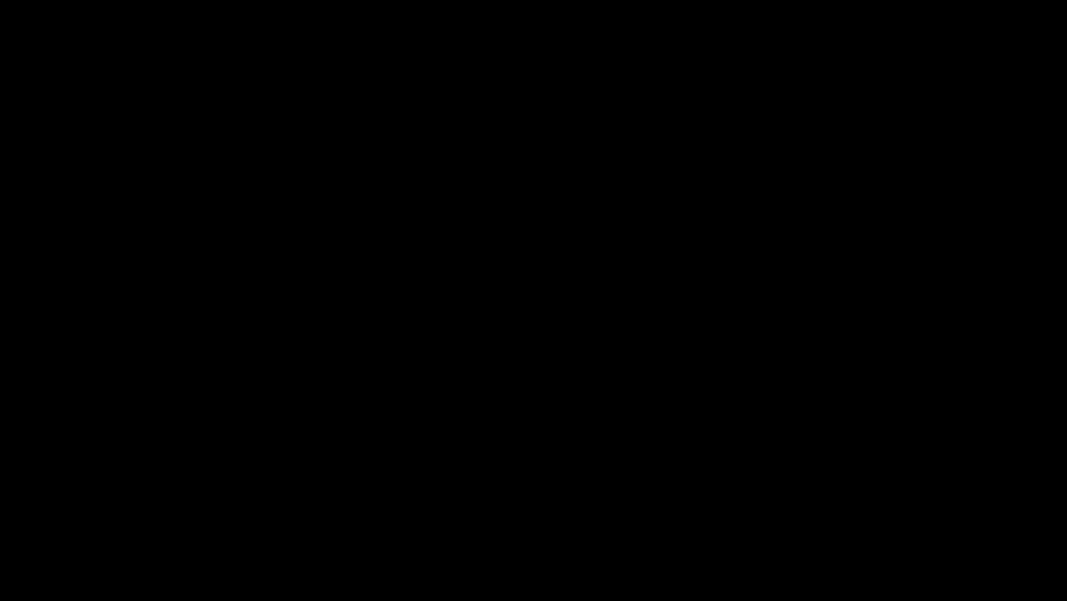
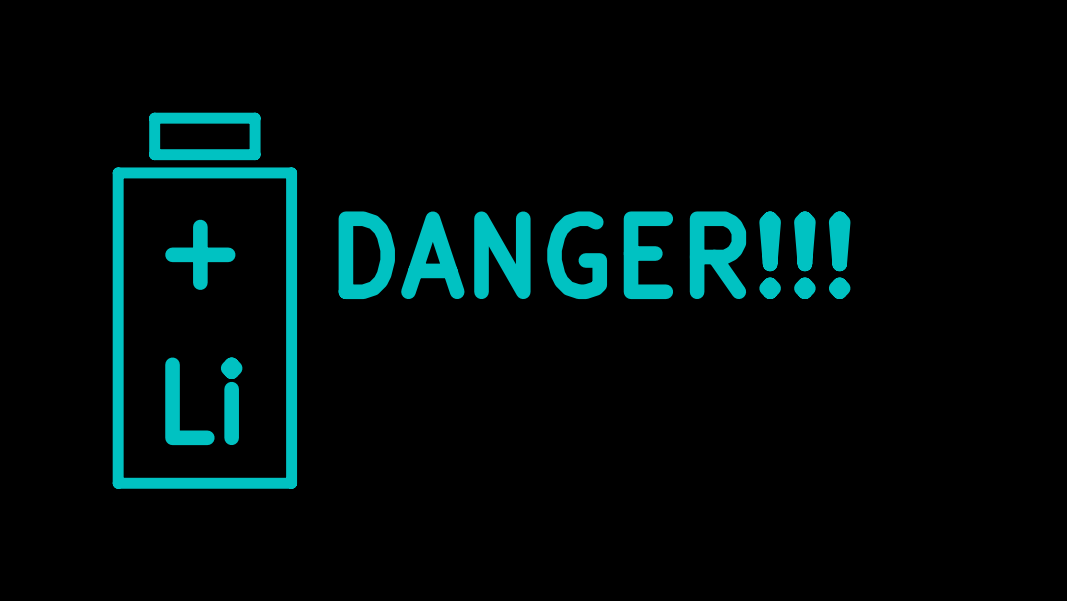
line: none -> (255, 118) (154, 118) (154, 154) (255, 154) (255, 118)
line: none -> (291, 172) (118, 172) (118, 483) (291, 483) (291, 172)
text: none -> + (200, 254)
text: none -> DANGER!!! (594, 255)
text: none -> Li (203, 401)

